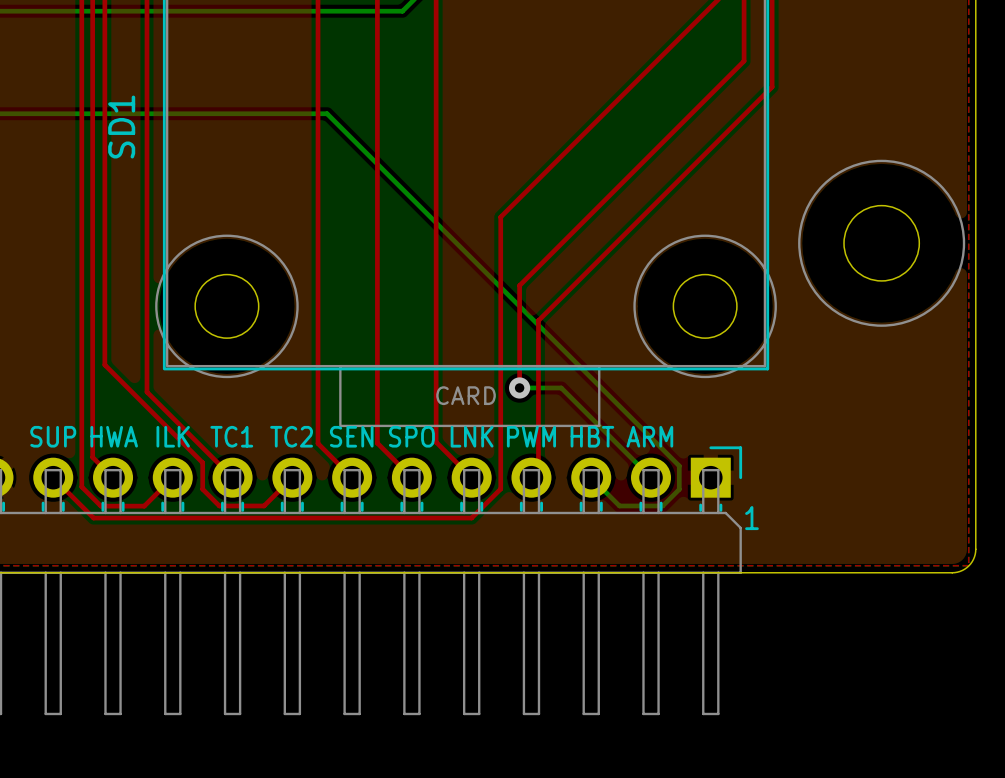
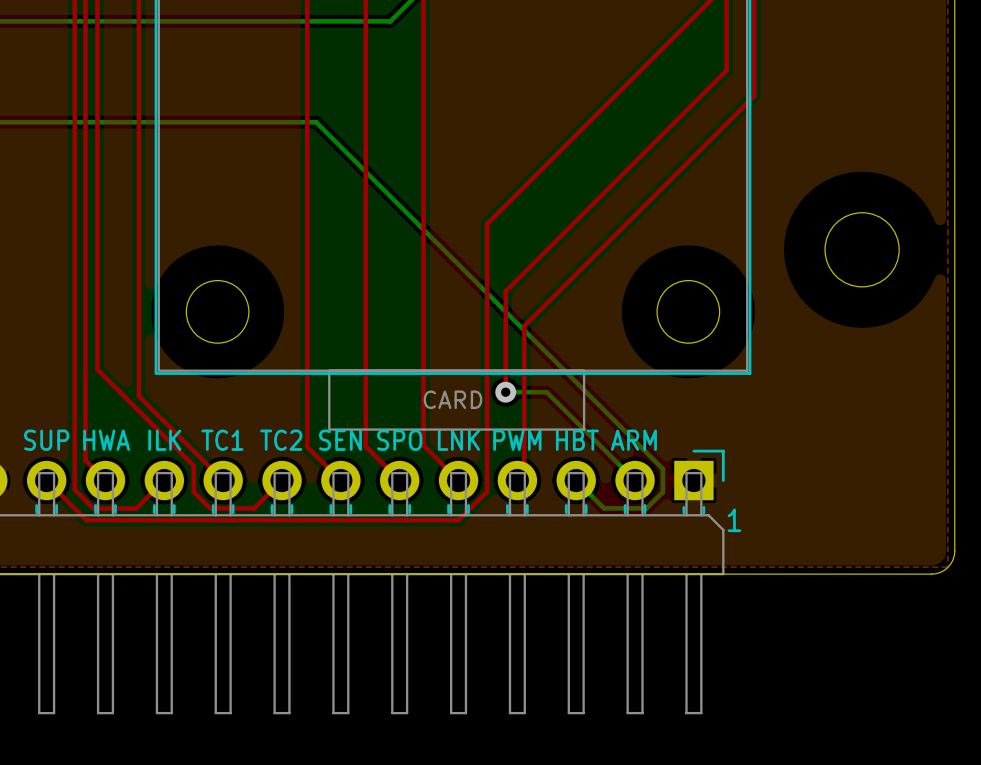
SD1 name: SD1 (121, 127) -> none
drawing: [633, 159, 966, 379] -> none
drawing: [155, 234, 299, 379] -> none

